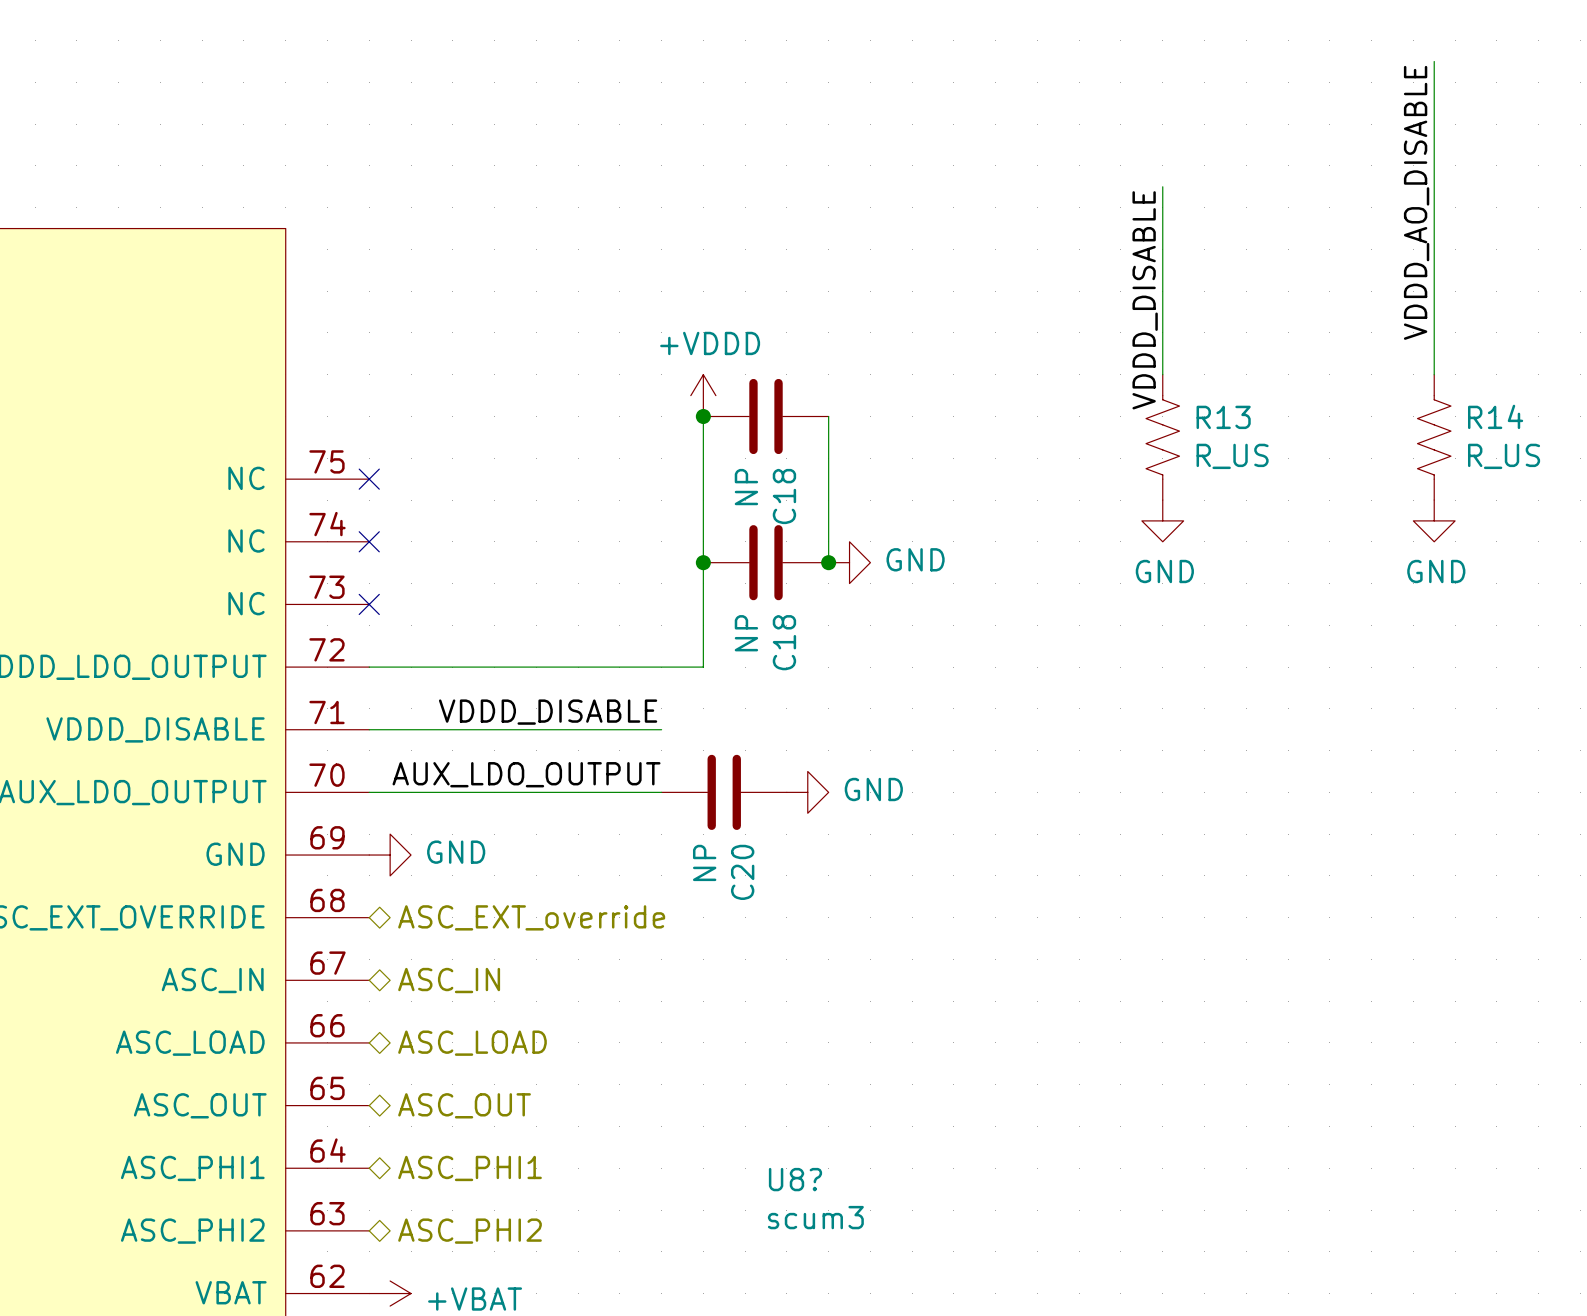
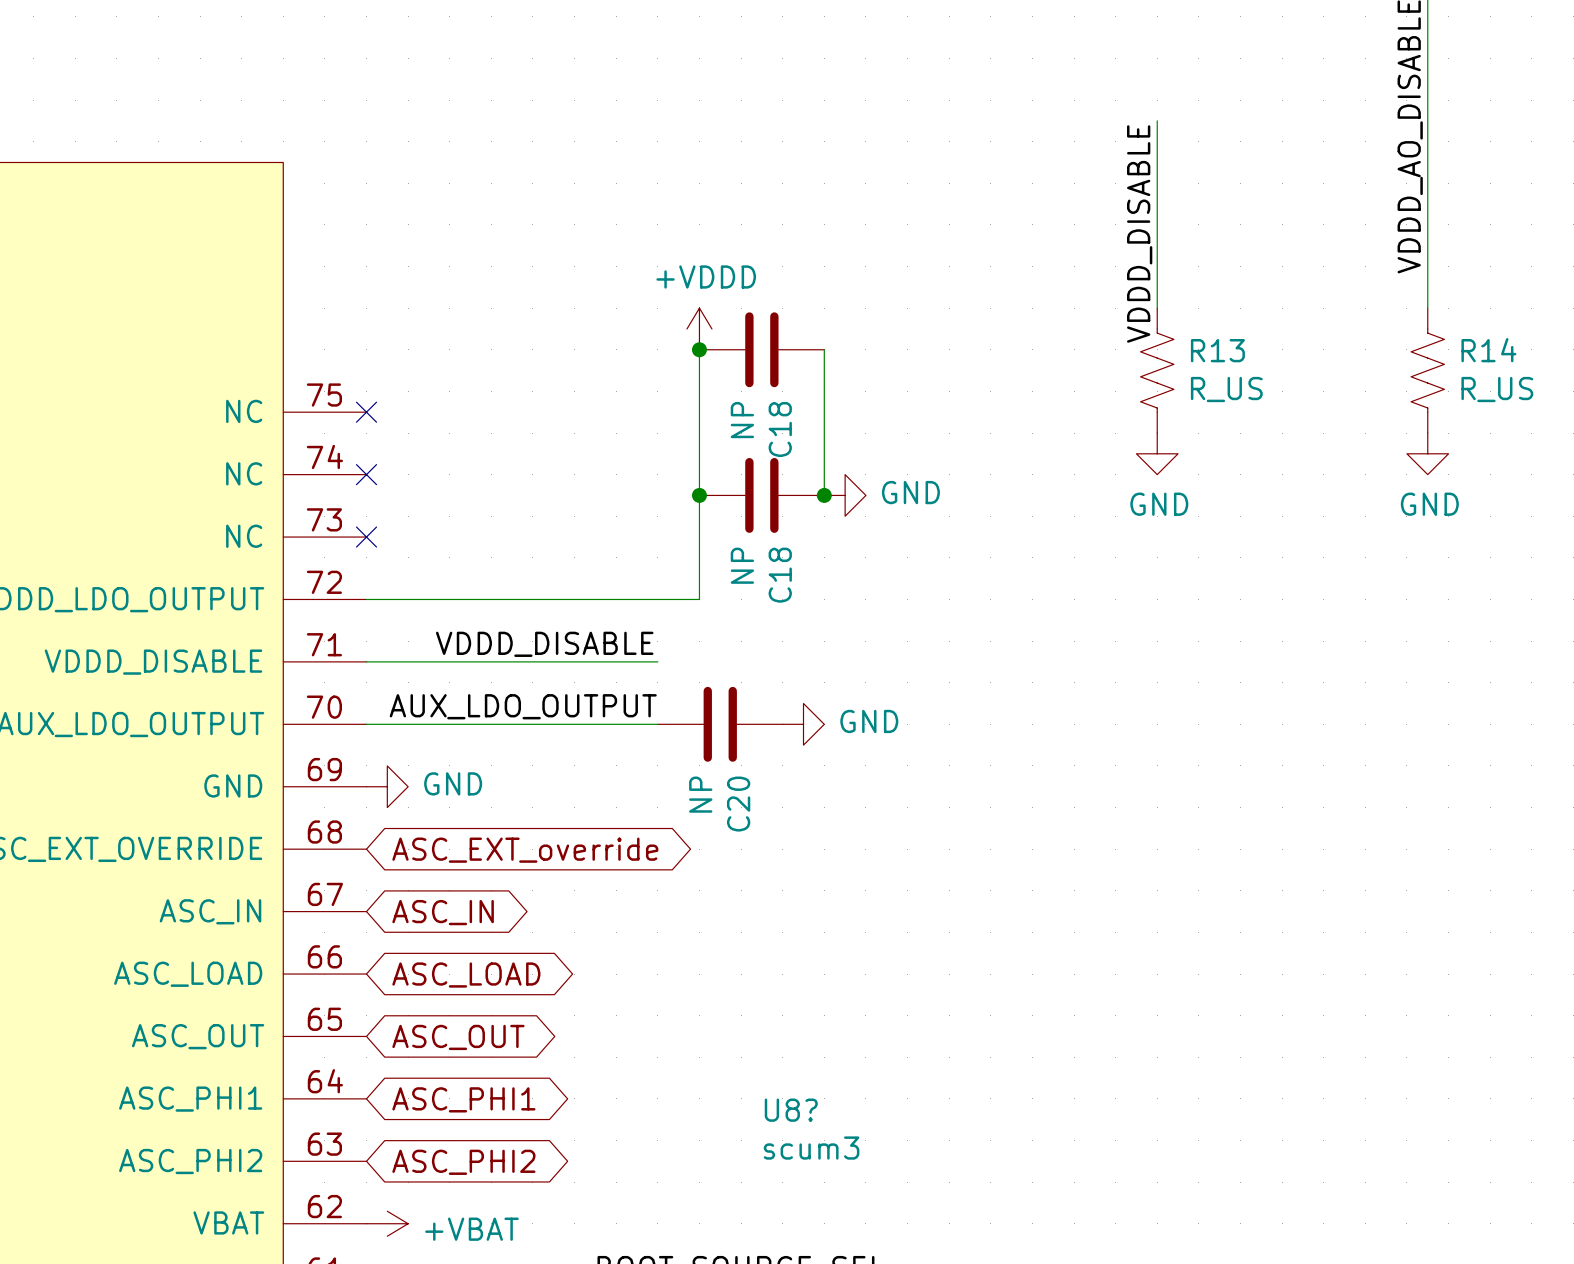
hierarchical label: ASC_EXT_override (531, 917) -> none
global label: none -> ASC_EXT_override (525, 850)
hierarchical label: ASC_IN (449, 980) -> none
global label: none -> ASC_IN (443, 912)
global label: none -> ASC_LOAD (466, 975)
hierarchical label: ASC_LOAD (472, 1043) -> none
hierarchical label: ASC_OUT (464, 1105) -> none
global label: none -> ASC_OUT (458, 1037)
hierarchical label: ASC_PHI1 (470, 1168) -> none
global label: none -> ASC_PHI1 (463, 1099)
global label: none -> ASC_PHI2 (463, 1162)
hierarchical label: ASC_PHI2 (470, 1231) -> none

